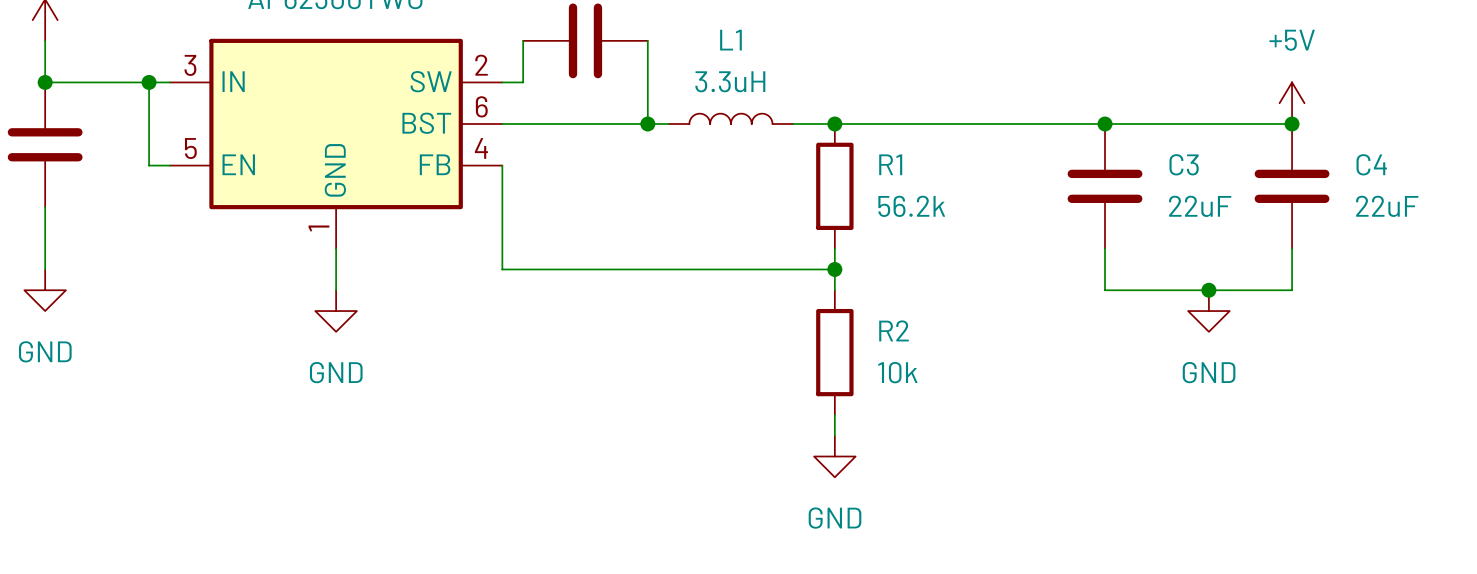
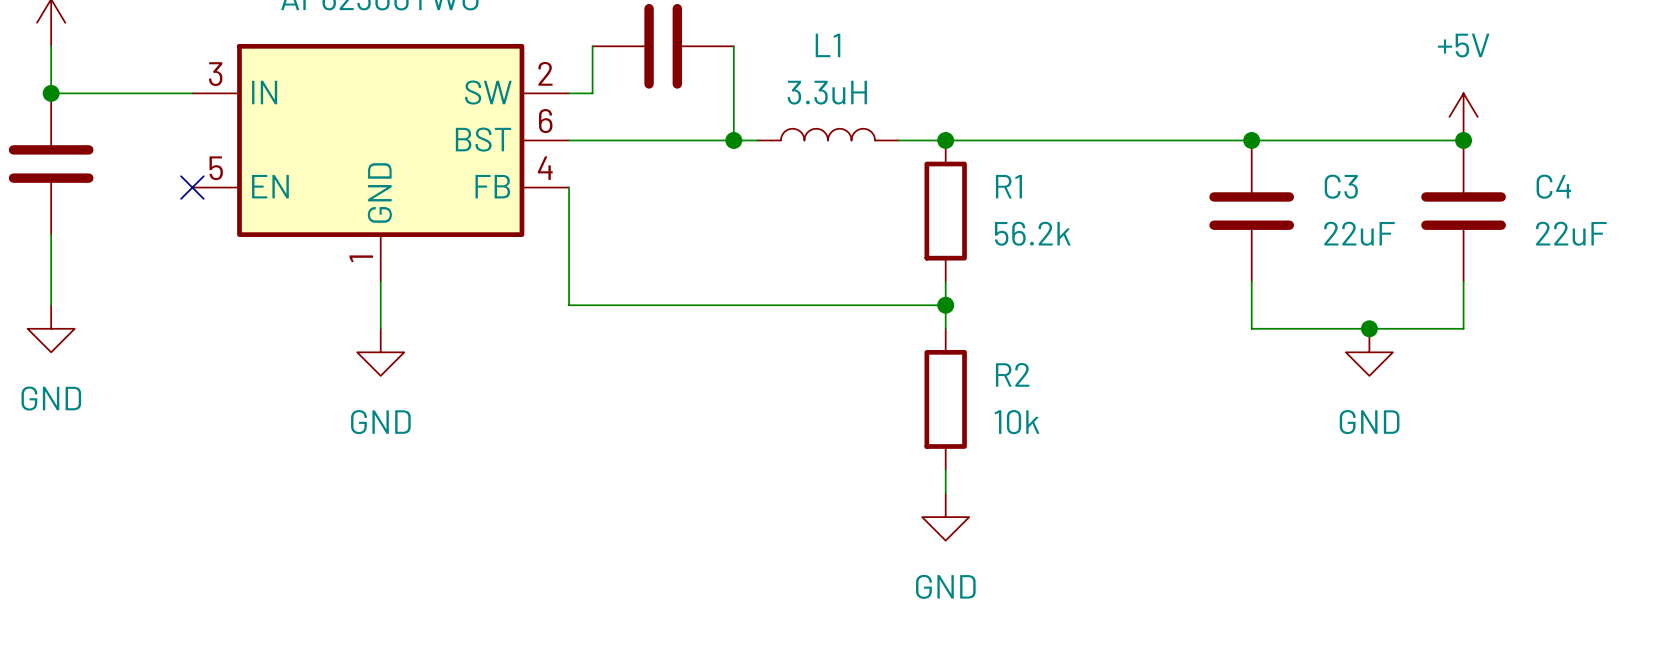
wire: (149, 82) (149, 165) (169, 165) -> none
junction: (149, 82) -> none
no-connect mark: none -> (192, 187)

